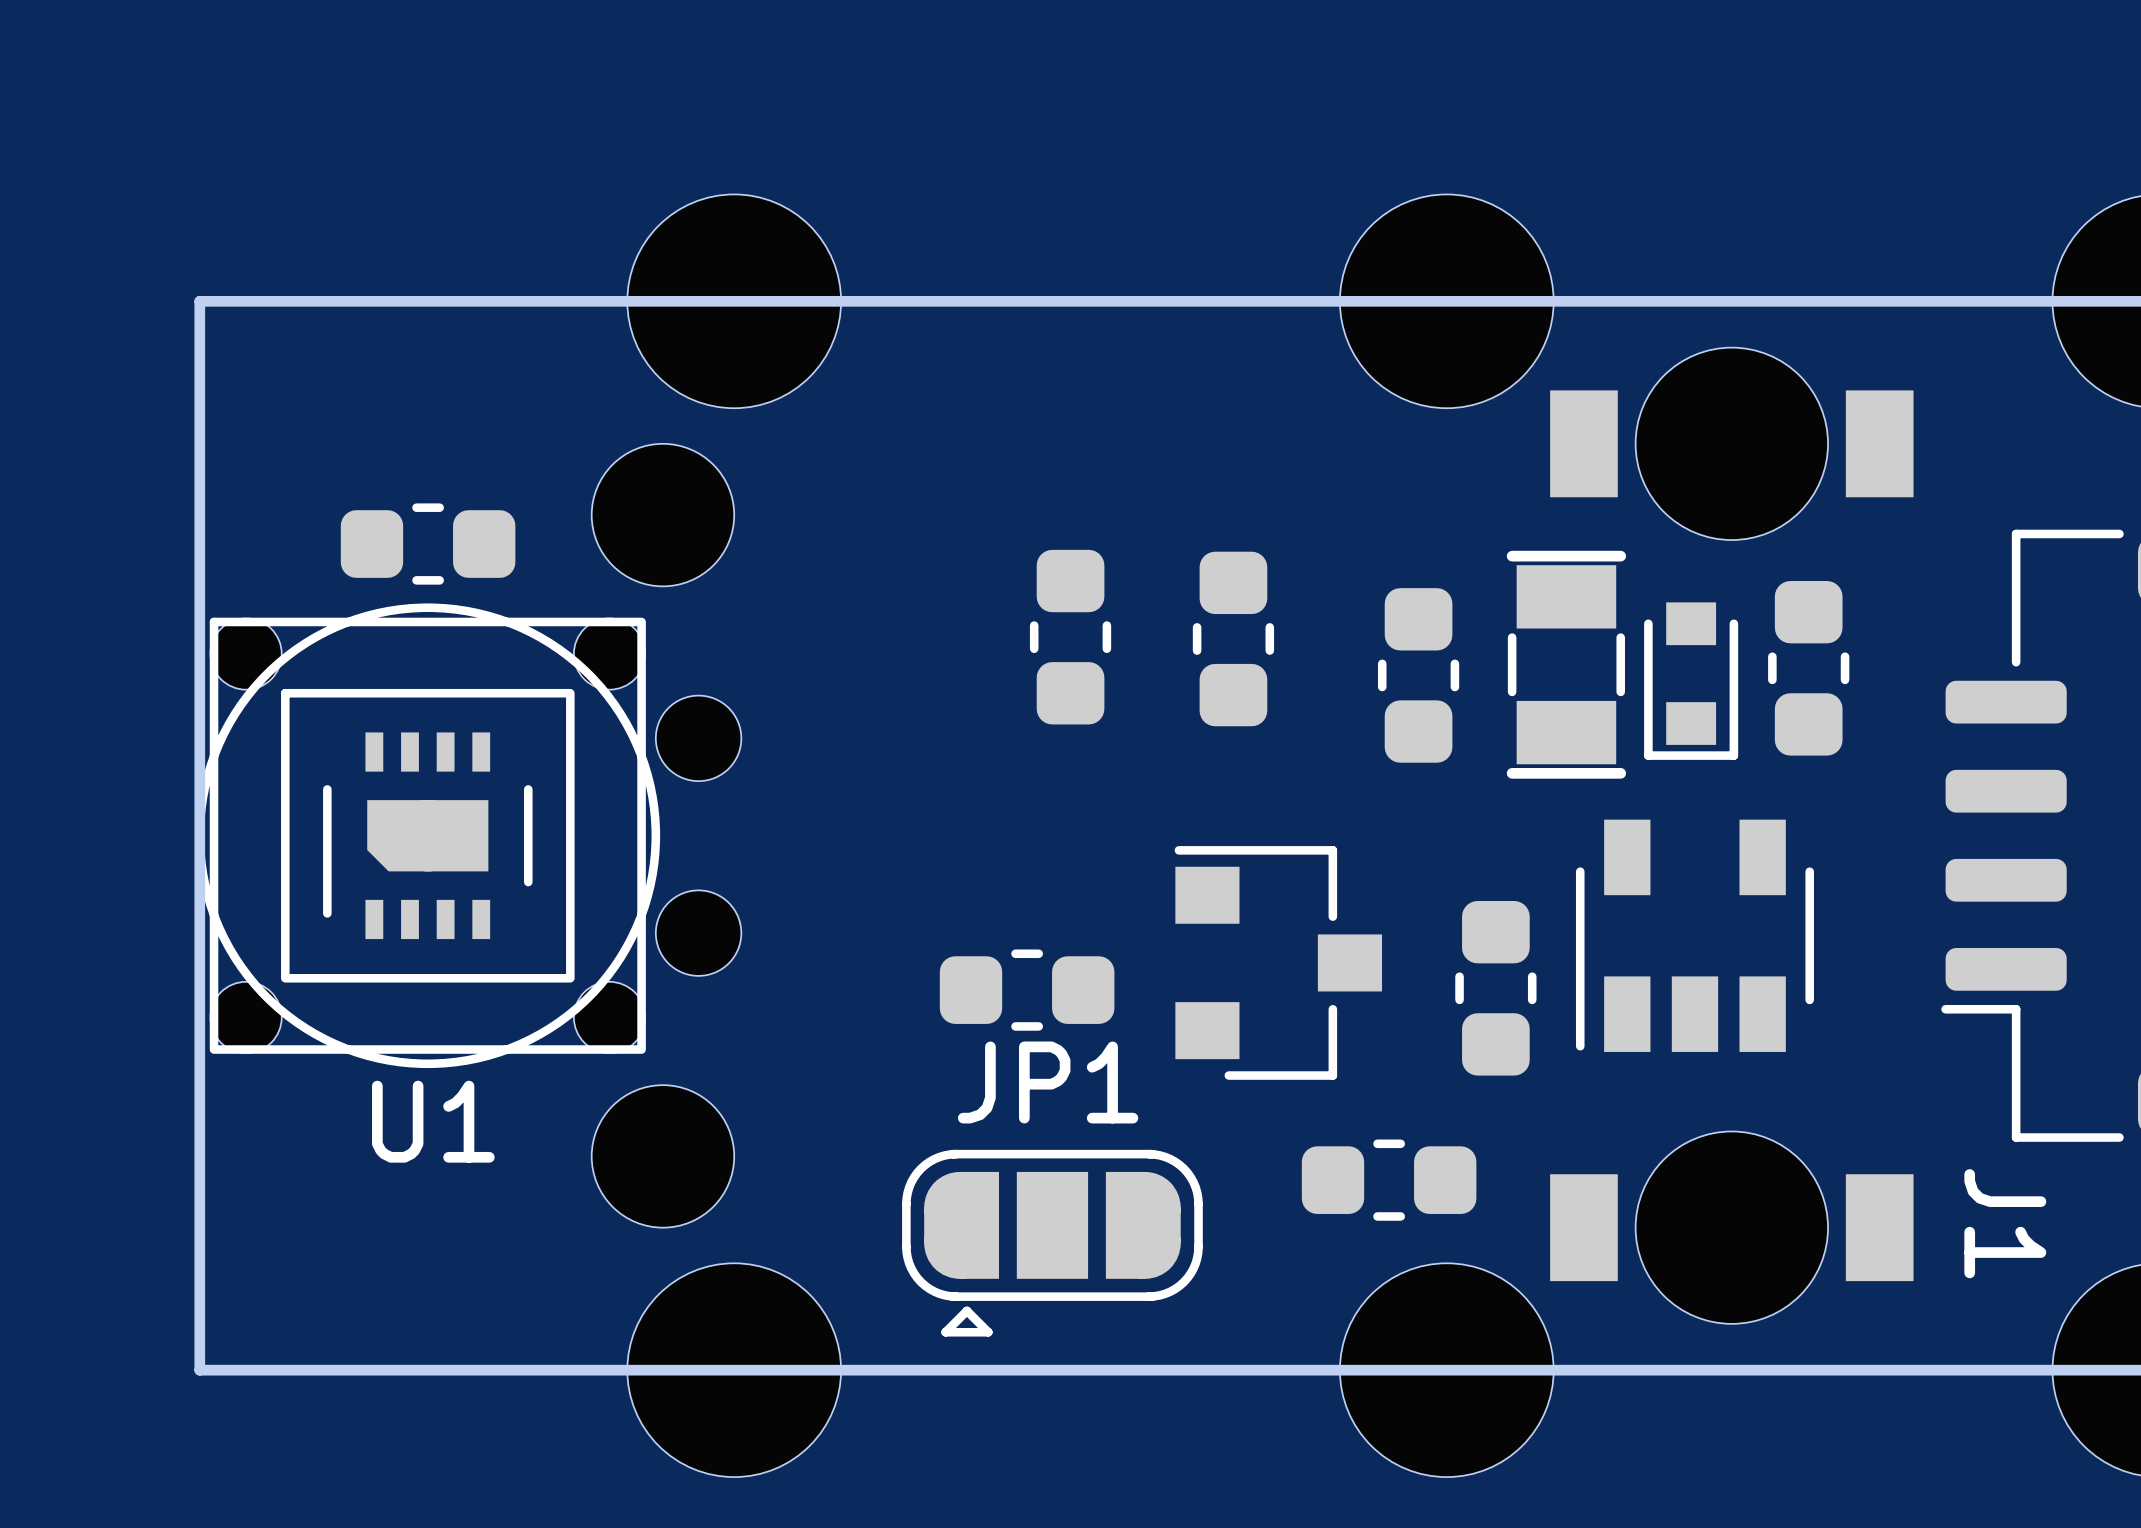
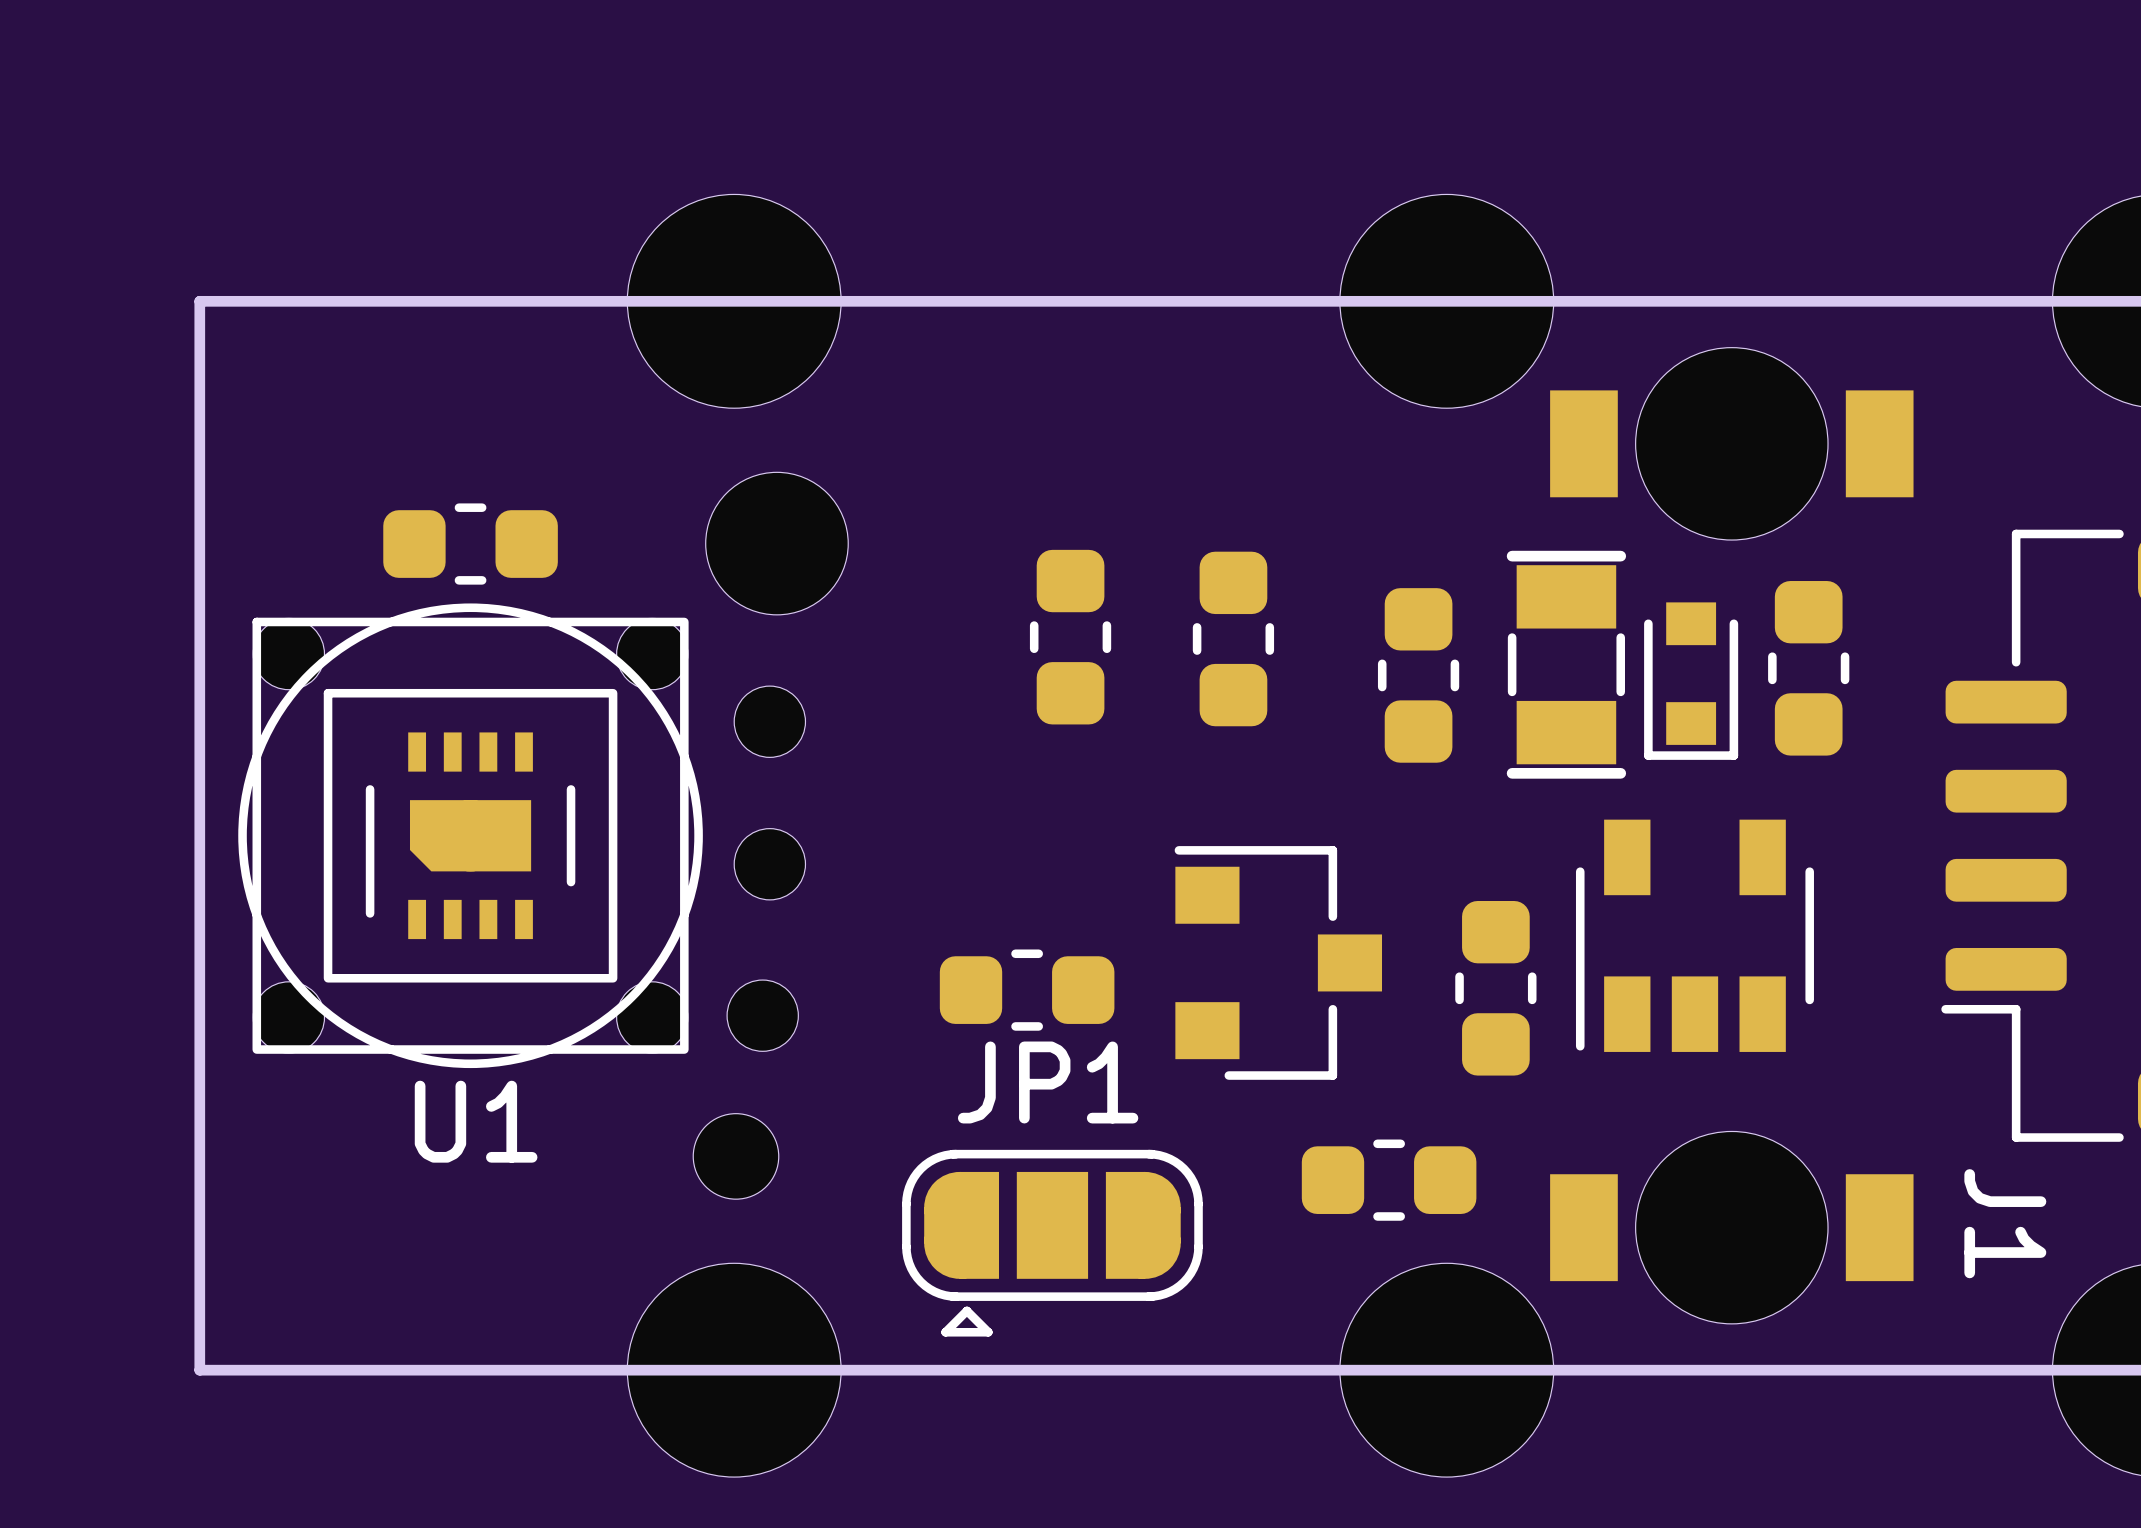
part position: (662, 515) -> (776, 543)
part position: (428, 544) -> (470, 544)
part: none -> (769, 721)
part: (698, 738) -> none
U1 position: (427, 835) -> (470, 835)
part position: (427, 835) -> (470, 835)
part: none -> (769, 864)
part: (698, 933) -> none
part: none -> (762, 1015)
part: (662, 1156) -> none
part: none -> (735, 1156)

